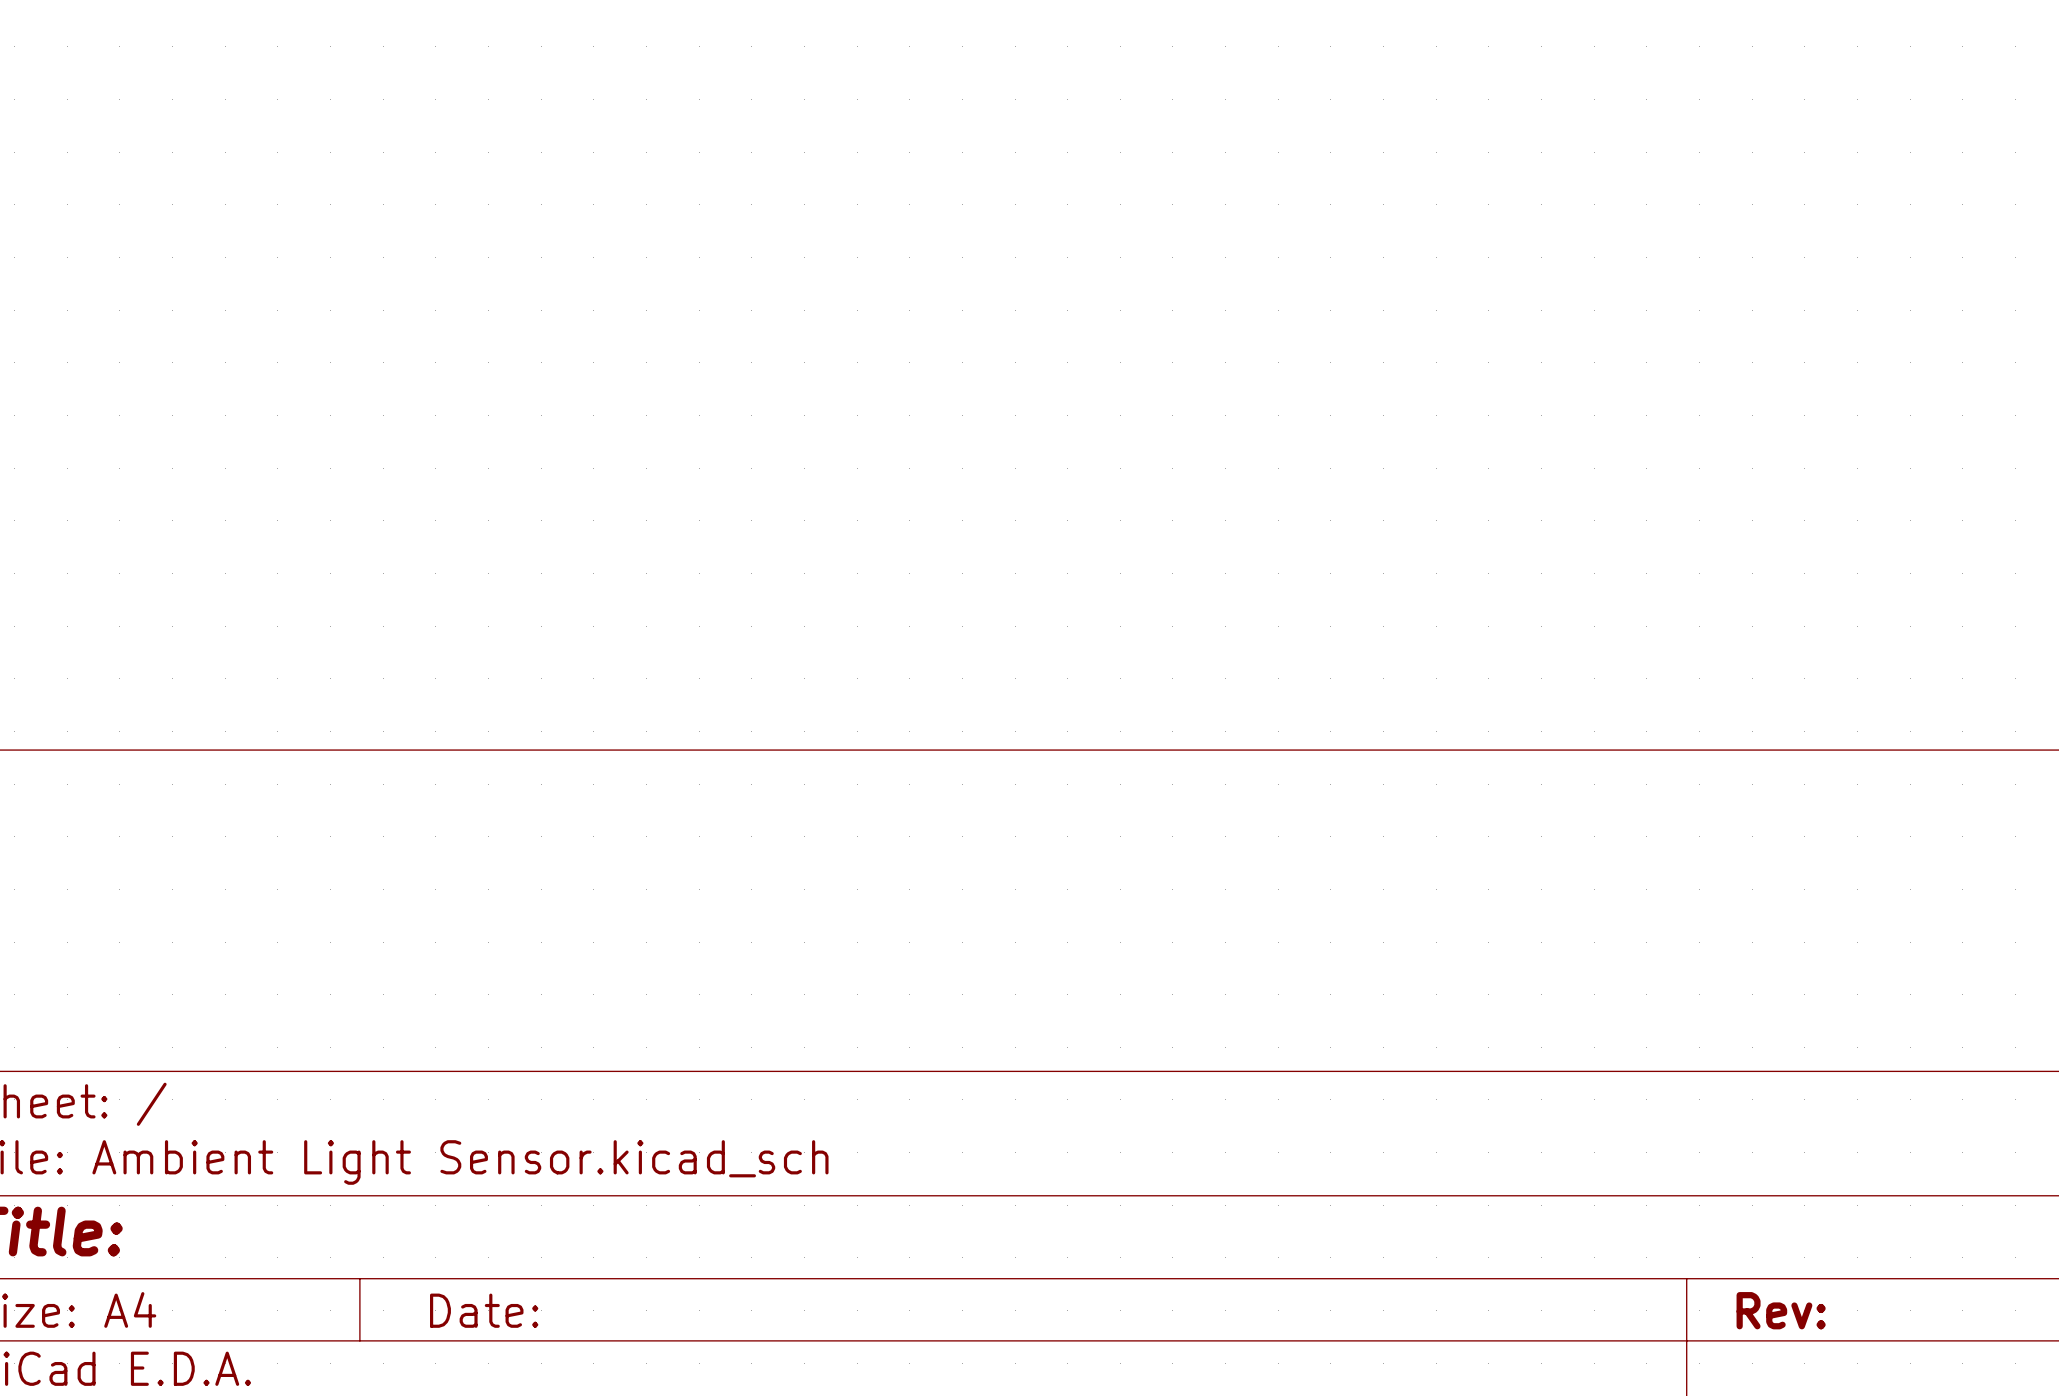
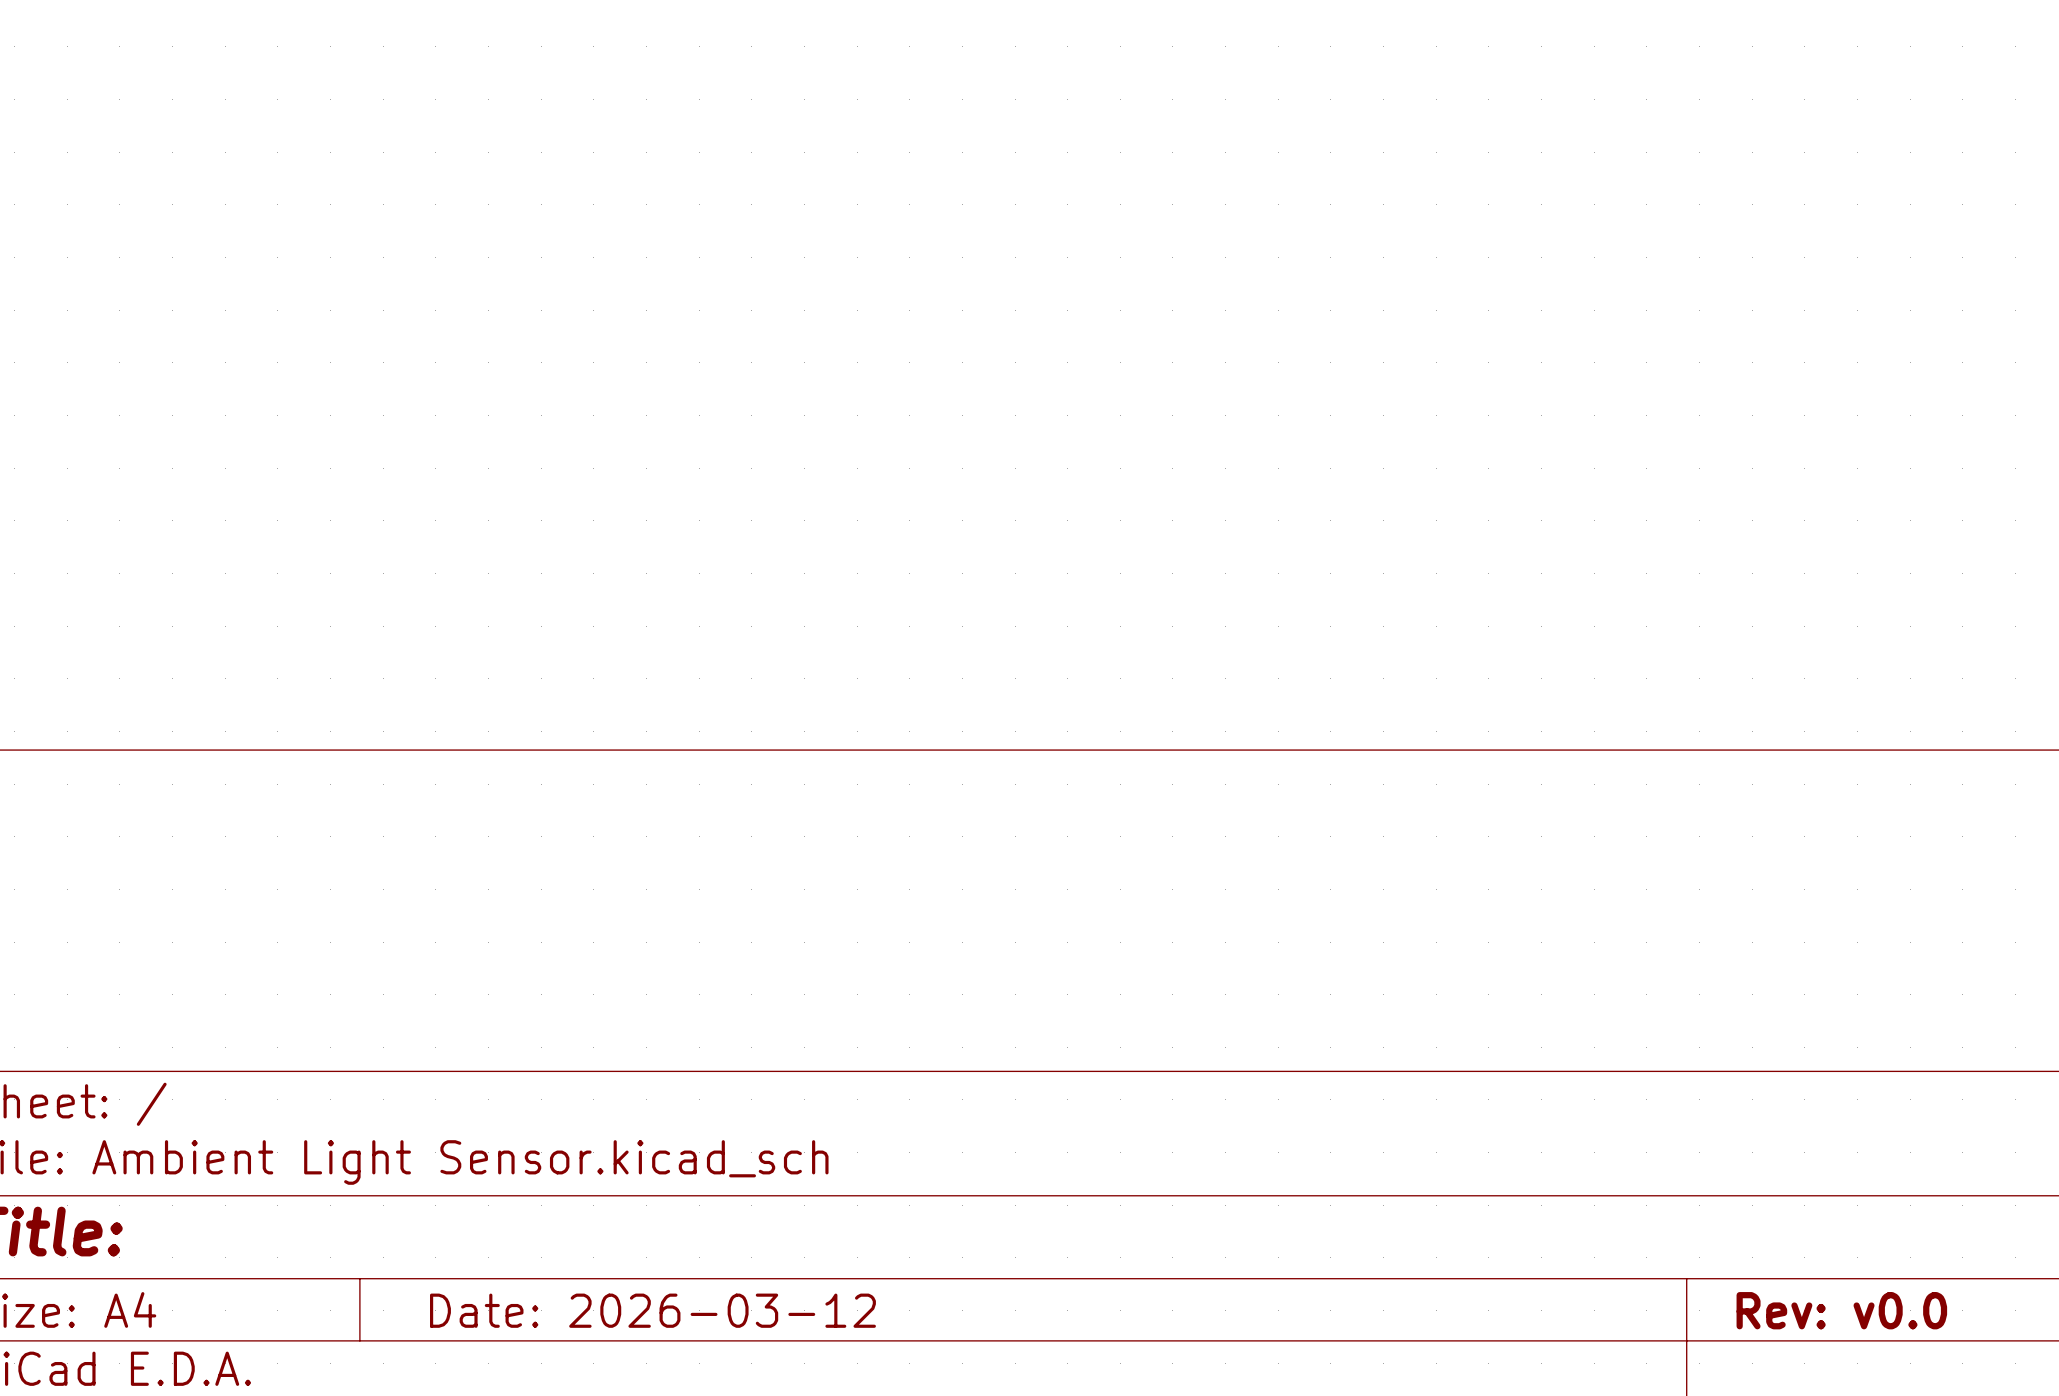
title block: Date: (484, 1310) -> Date: 2026-03-12 (652, 1310)
title block: Rev: (1781, 1310) -> Rev: v0.0 (1841, 1310)

